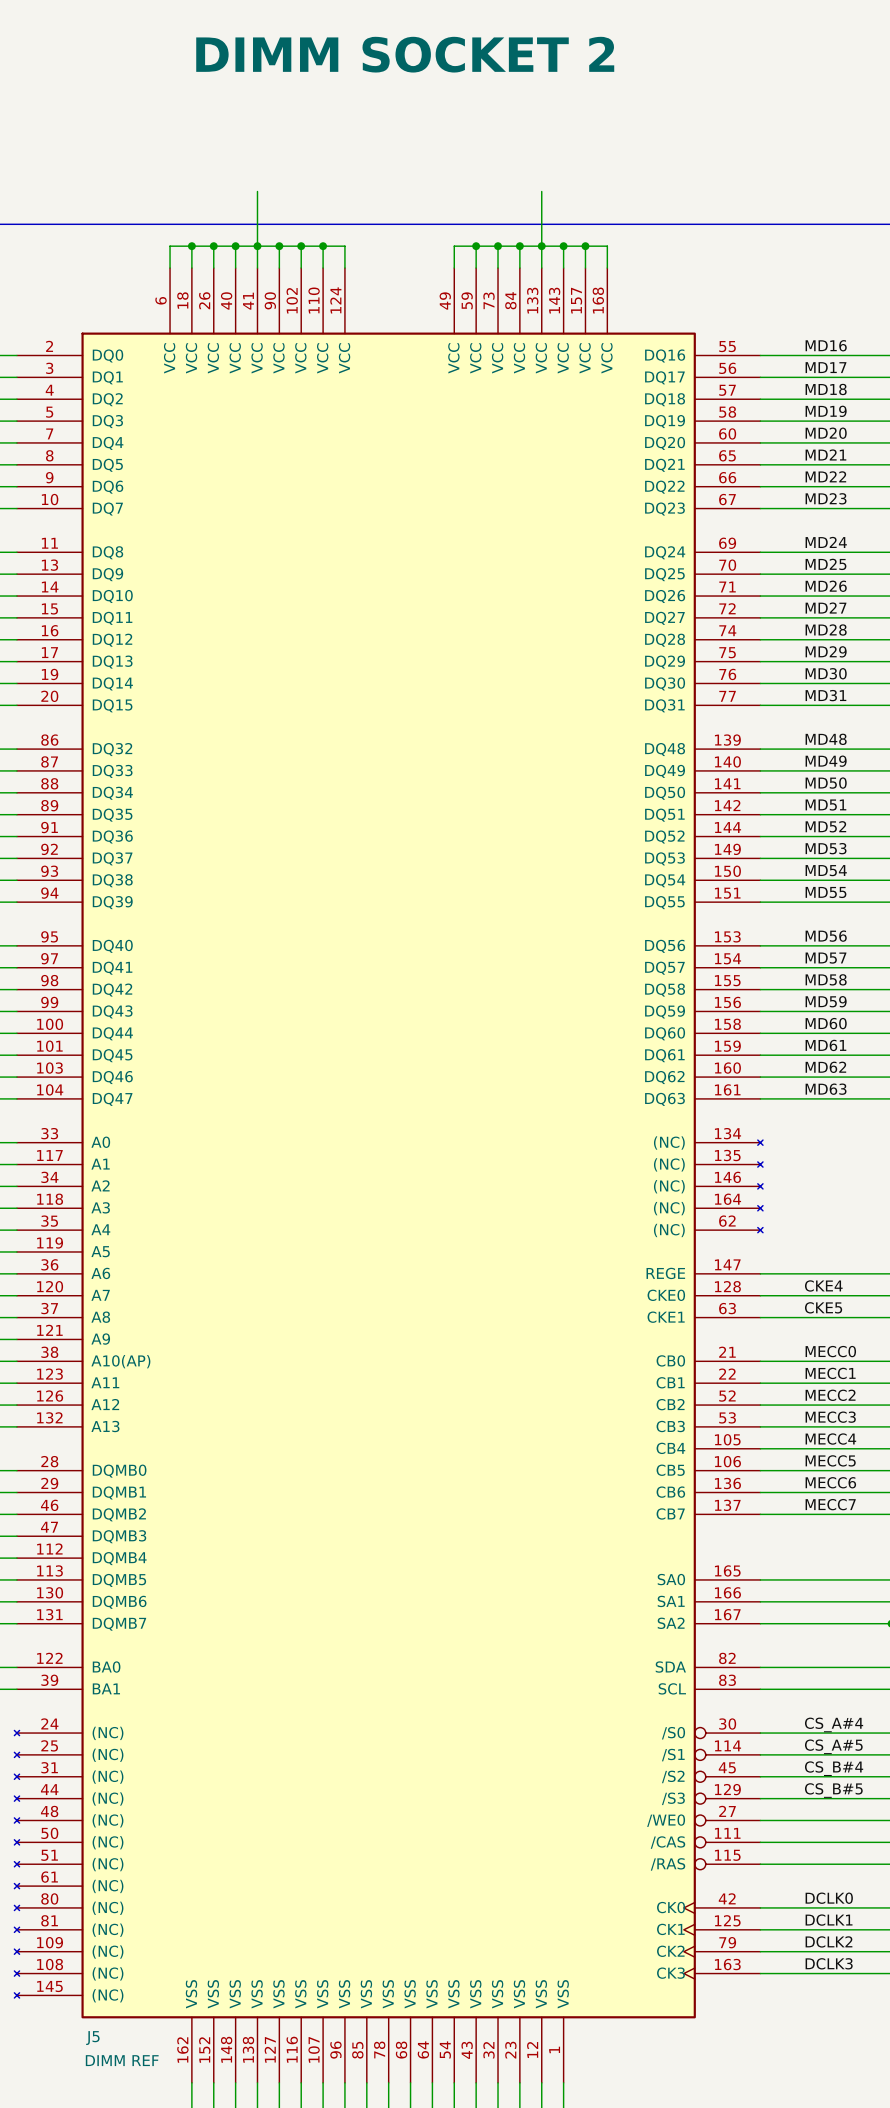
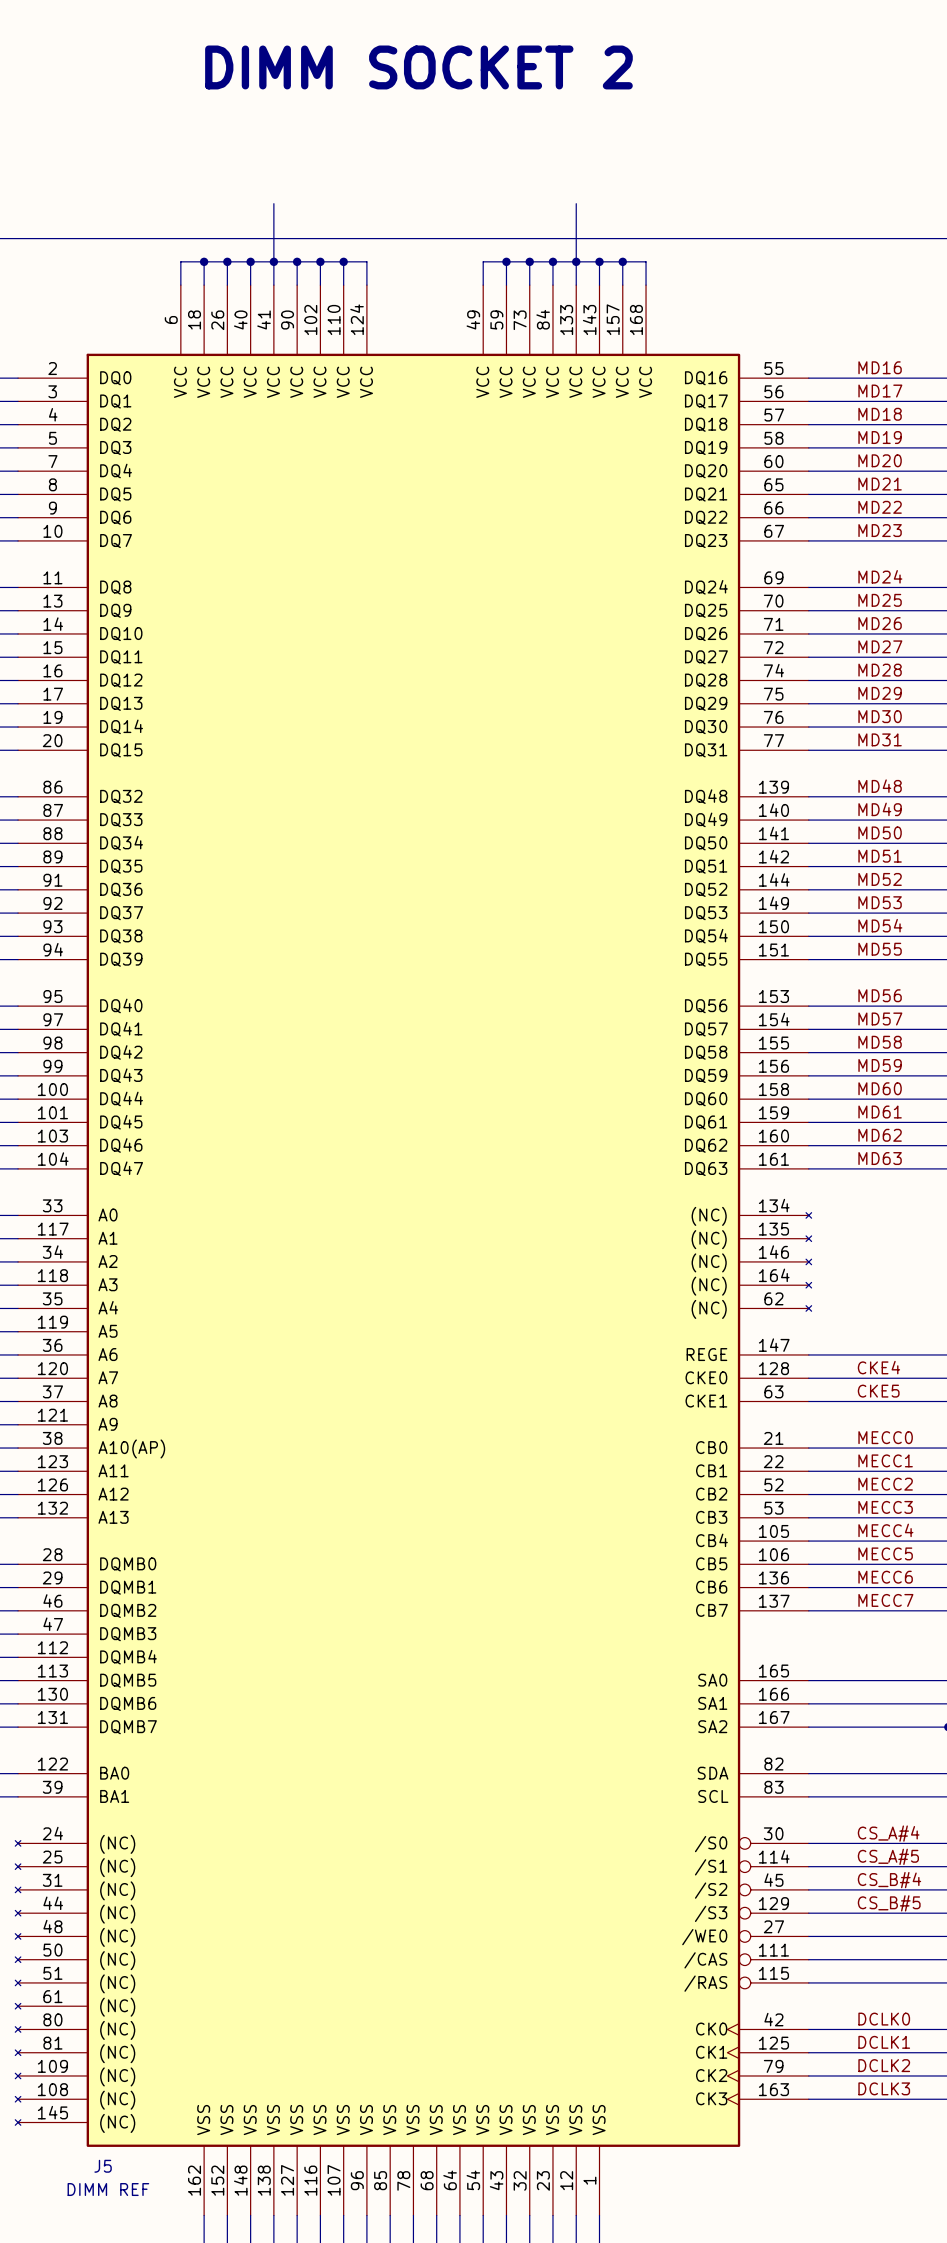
J5 value: DIMM SOCKET 2 (405, 54) -> DIMM REF (108, 2189)
text: none -> DIMM SOCKET 2 (418, 67)
J5 text: DIMM REF (122, 2060) -> none

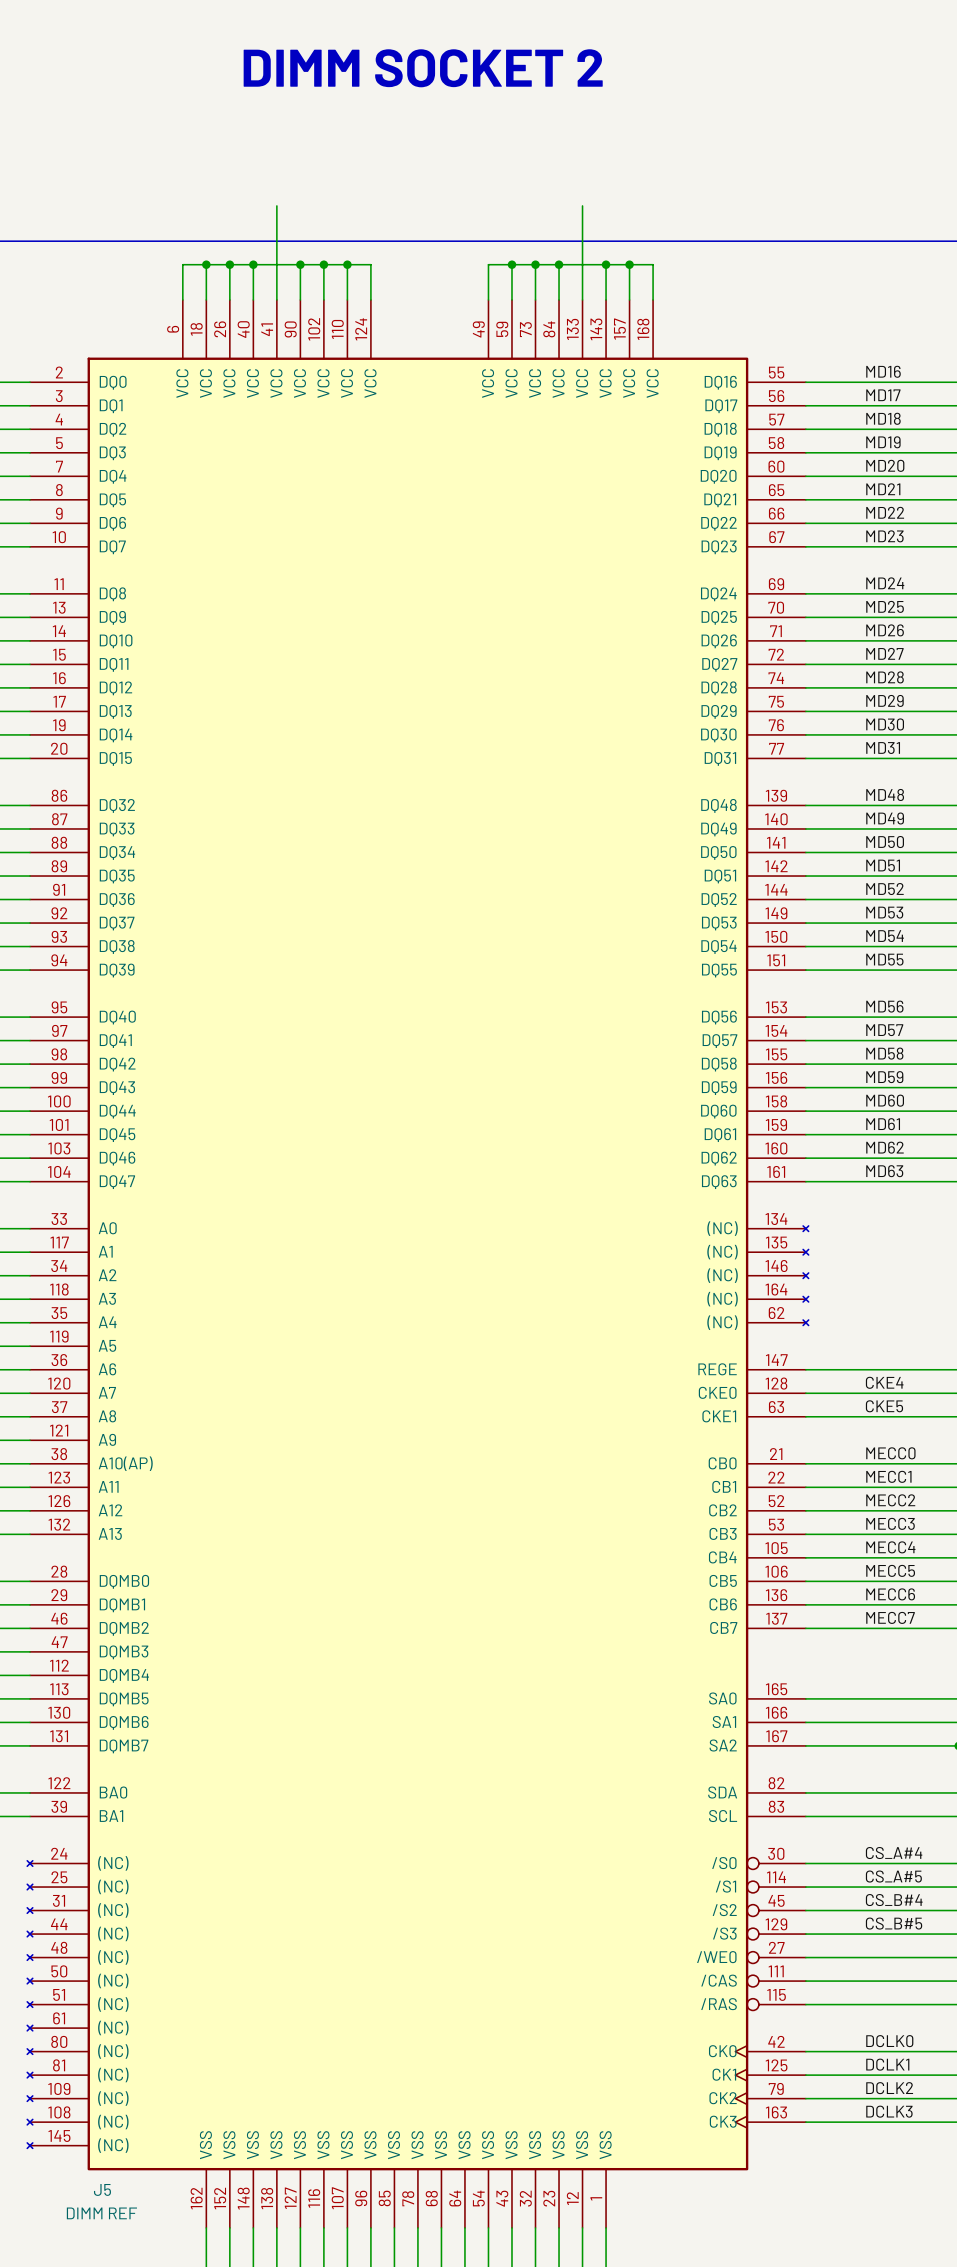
junction: (273, 261) -> none
junction: (576, 261) -> none
J5 symbol: [15, 285, 812, 2216] -> [27, 299, 809, 2228]

